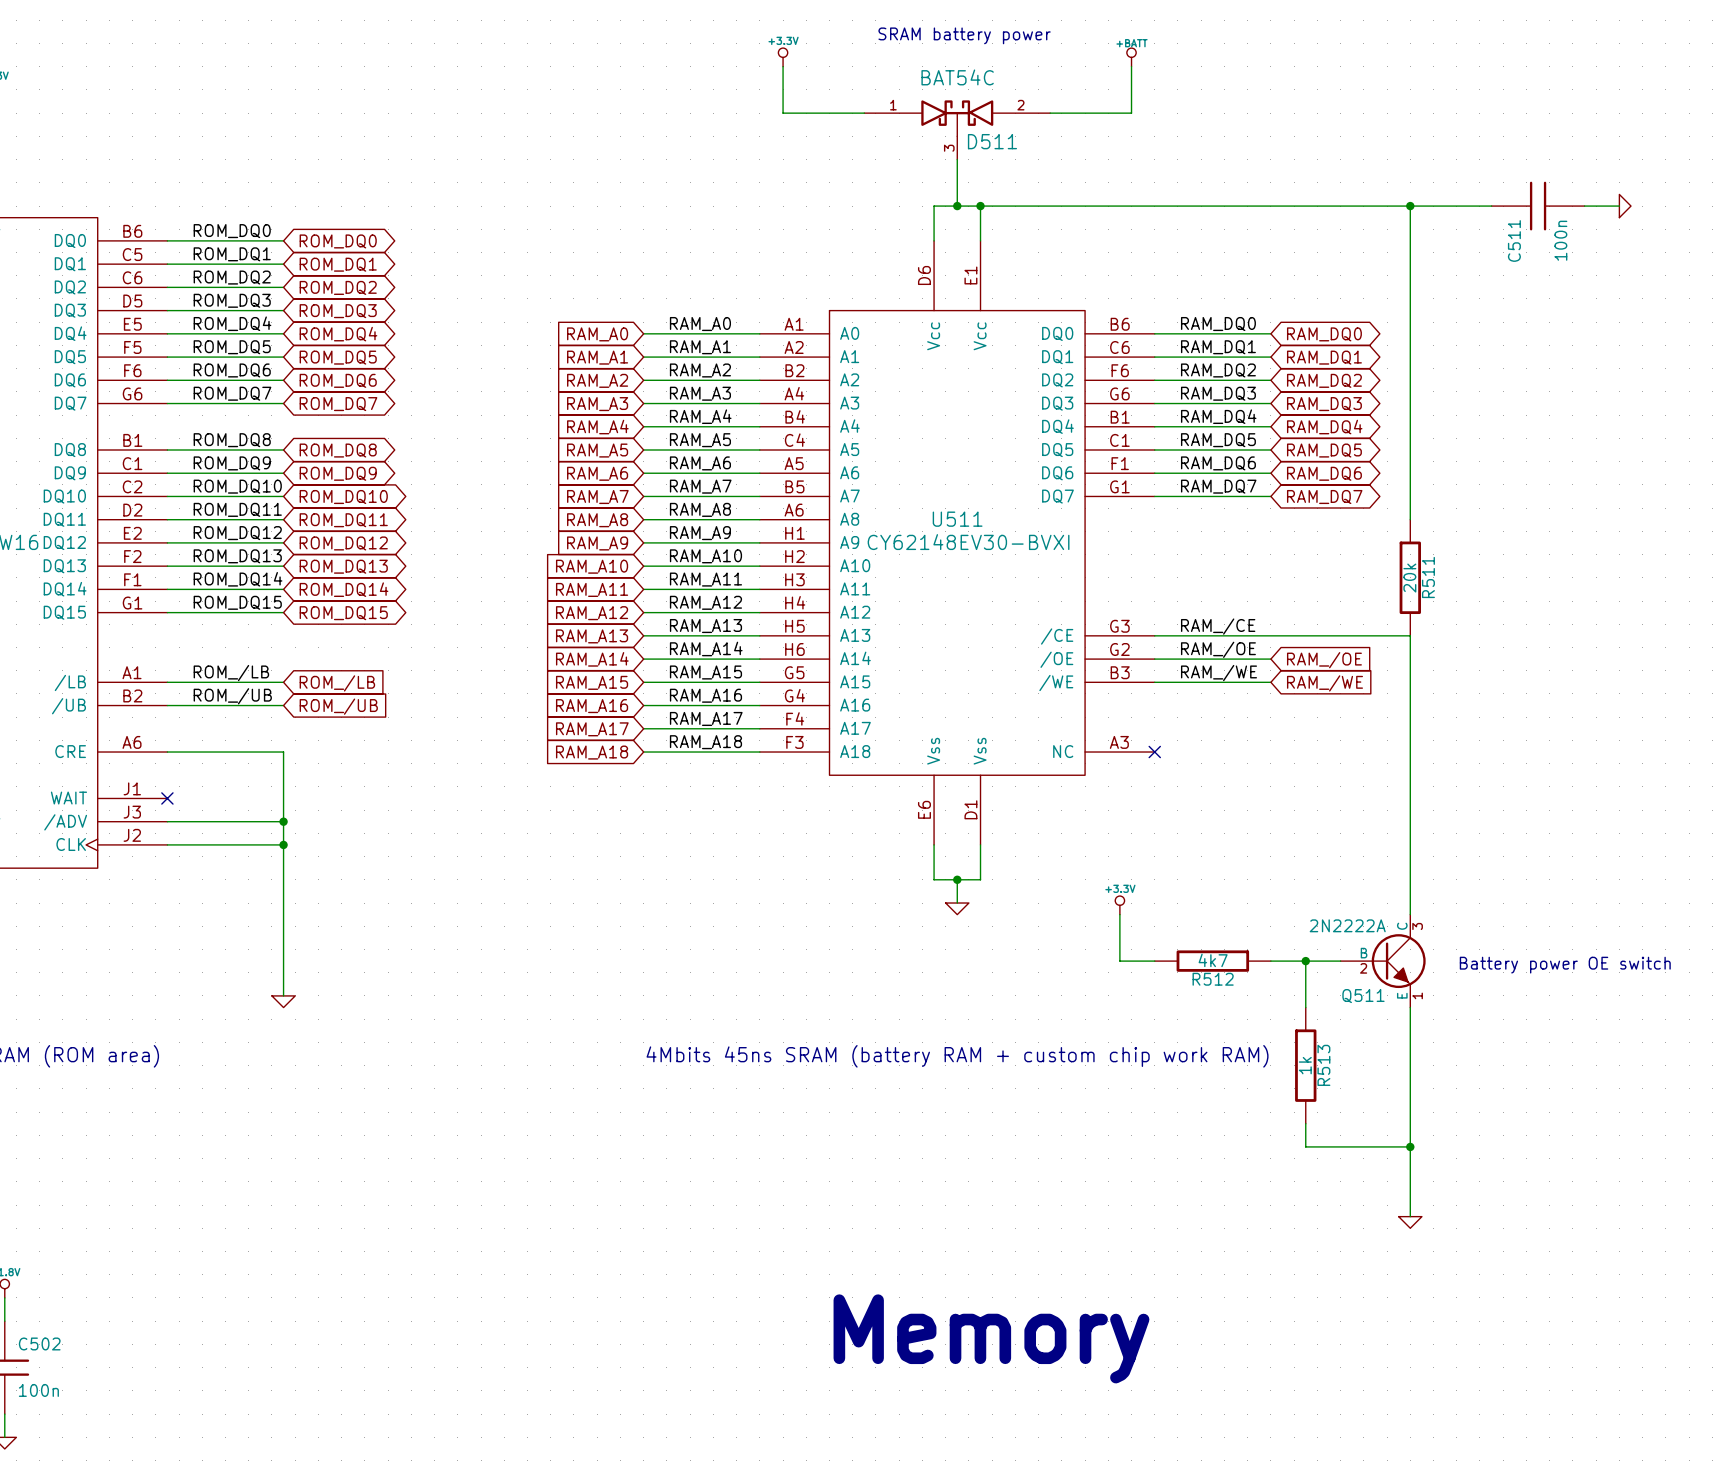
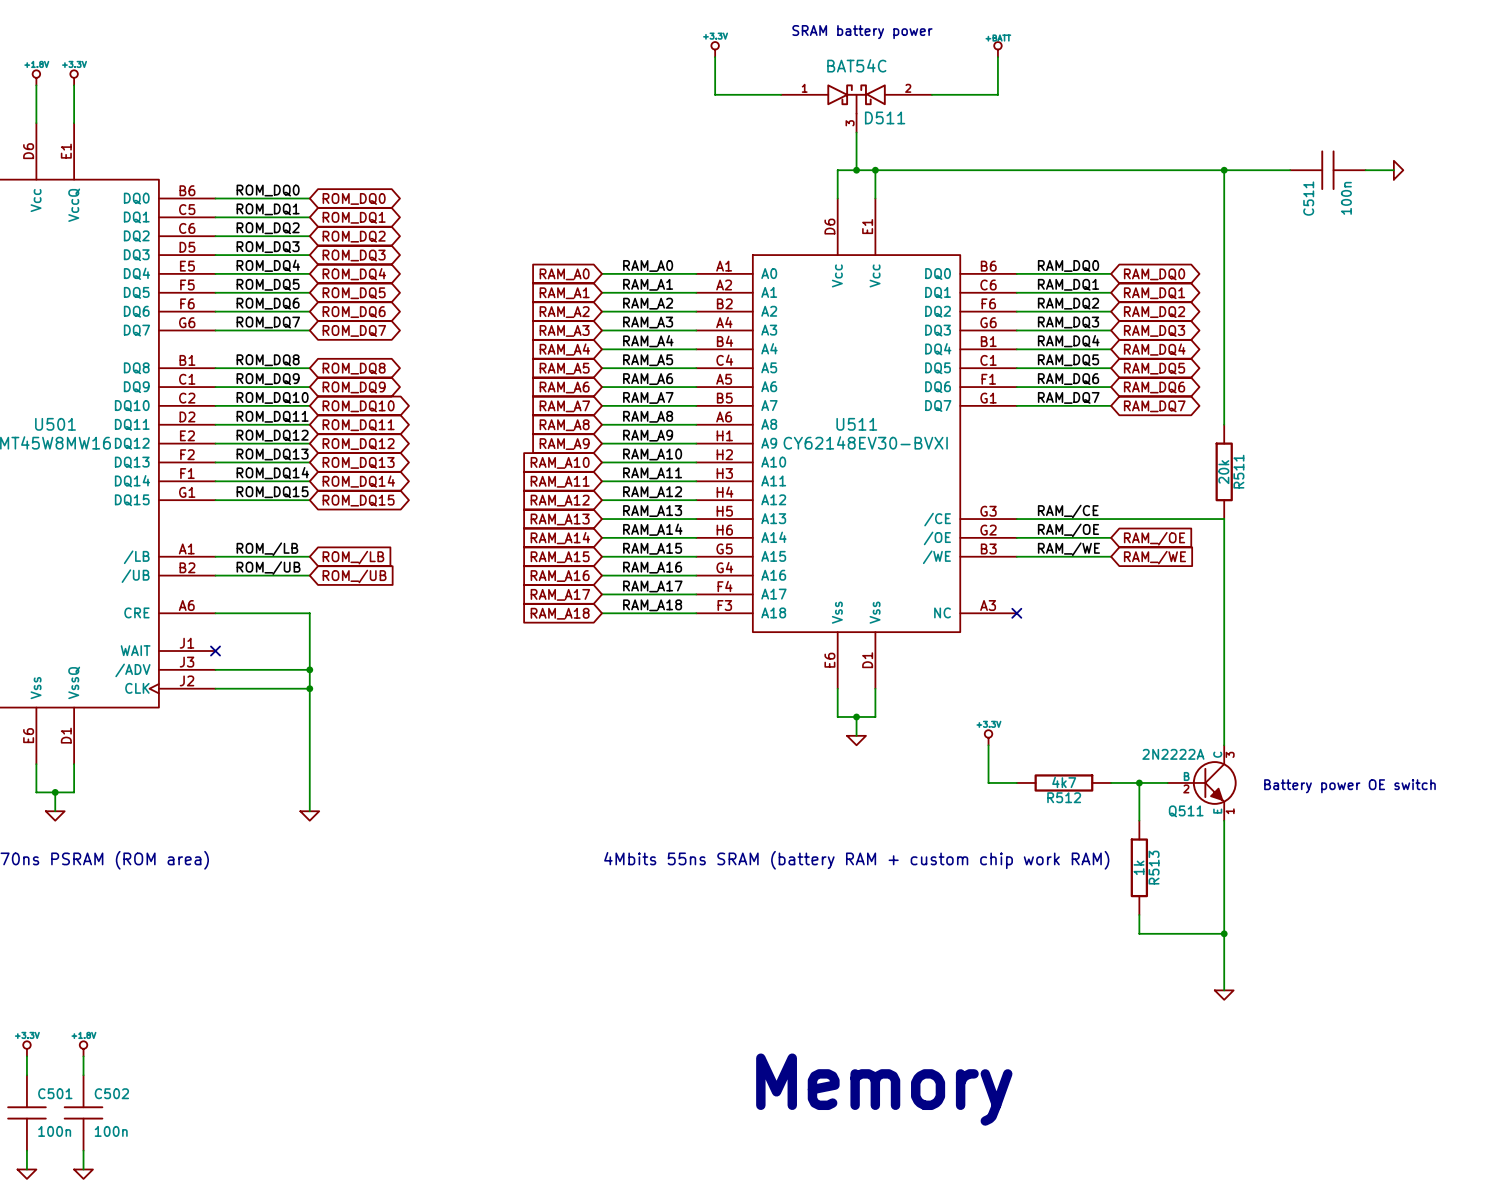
text: 4Mbits 45ns SRAM (battery RAM + custom chip work RAM) (957, 1056) -> 4Mbits 55ns SRAM (battery RAM + custom chip work RAM) (856, 860)

